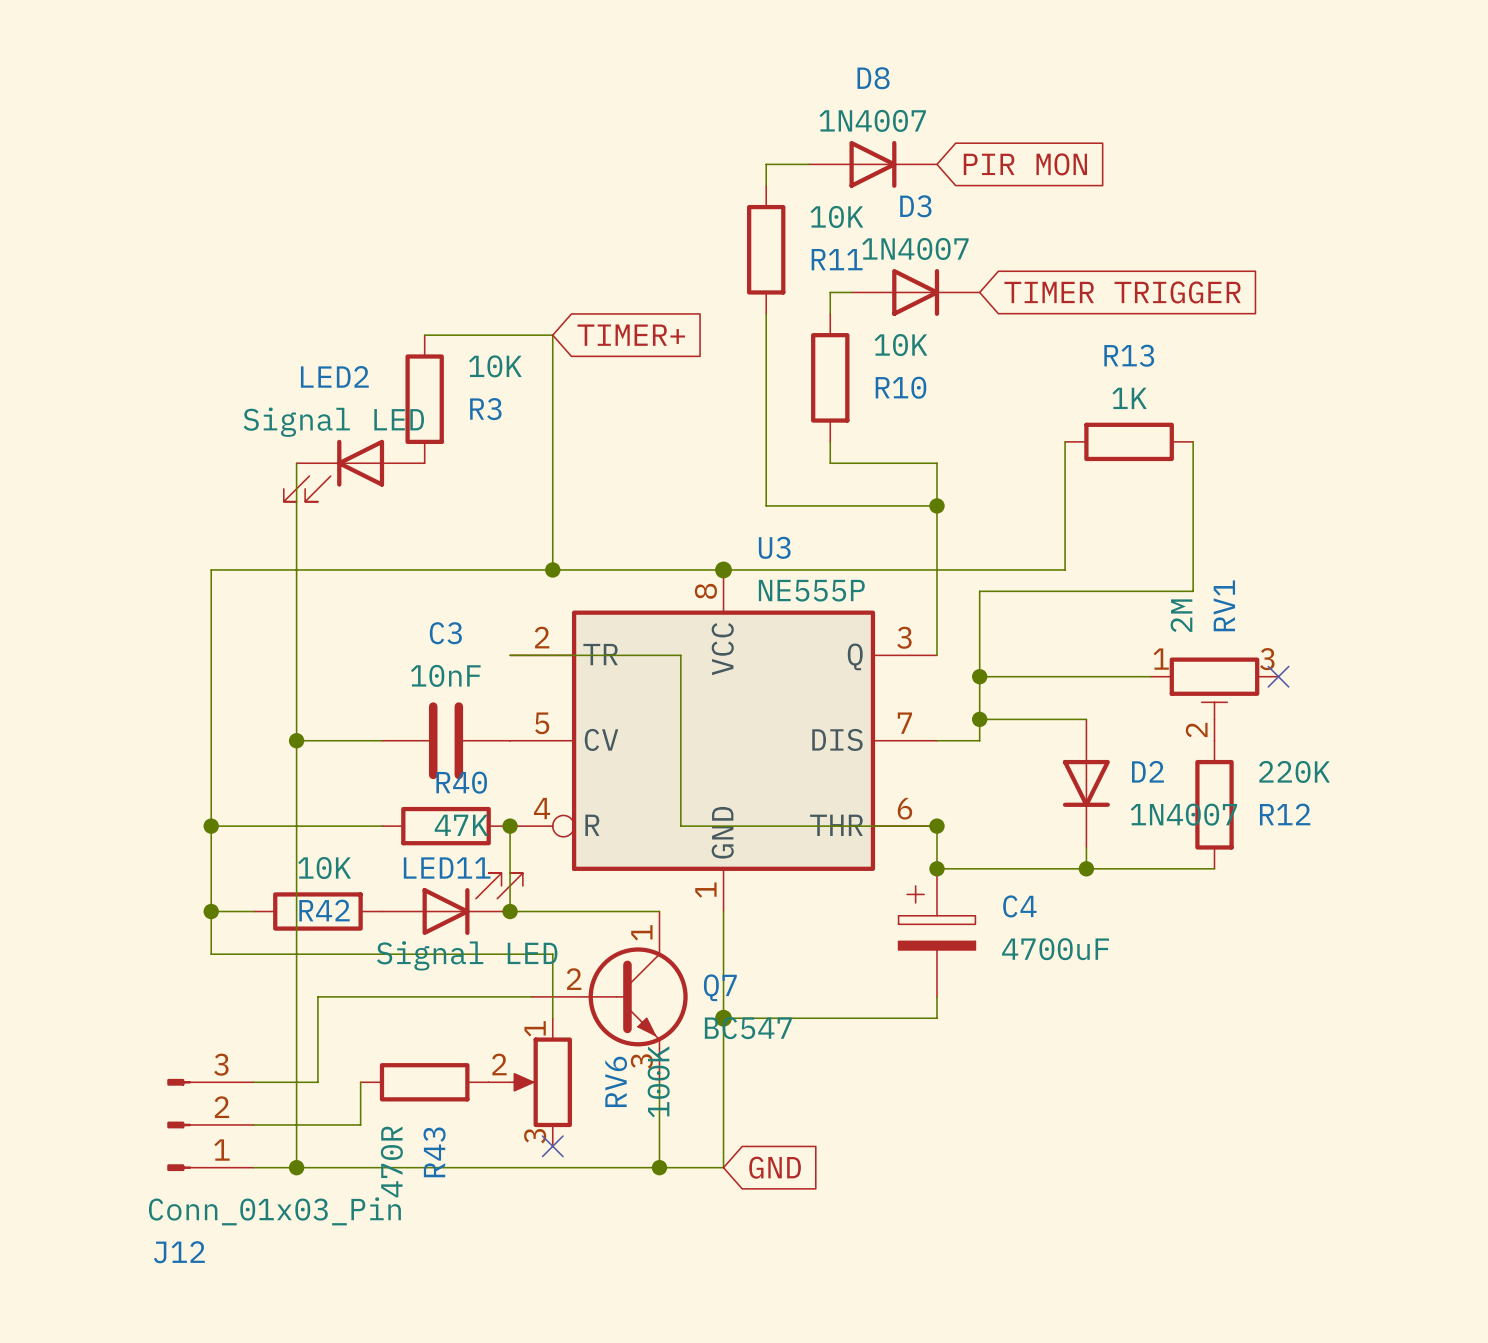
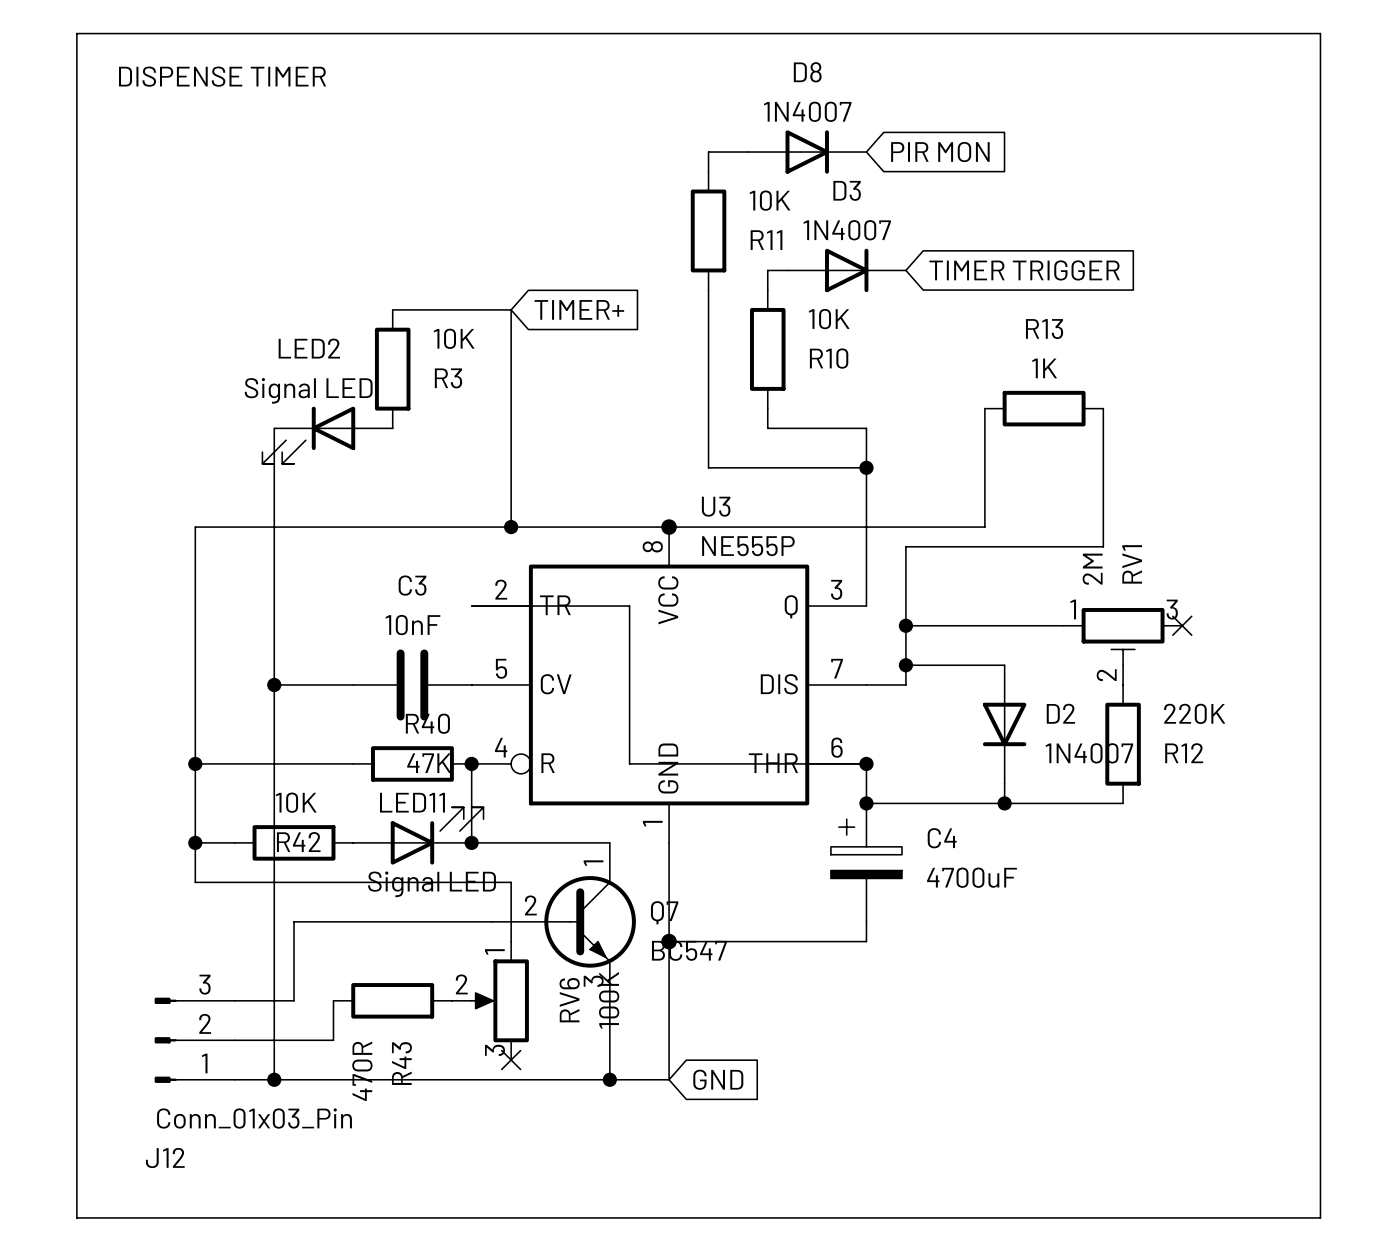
line: none -> (76, 33) (1320, 33) (1320, 1217) (76, 1217) (76, 33)
text: none -> DISPENSE TIMER (222, 76)

